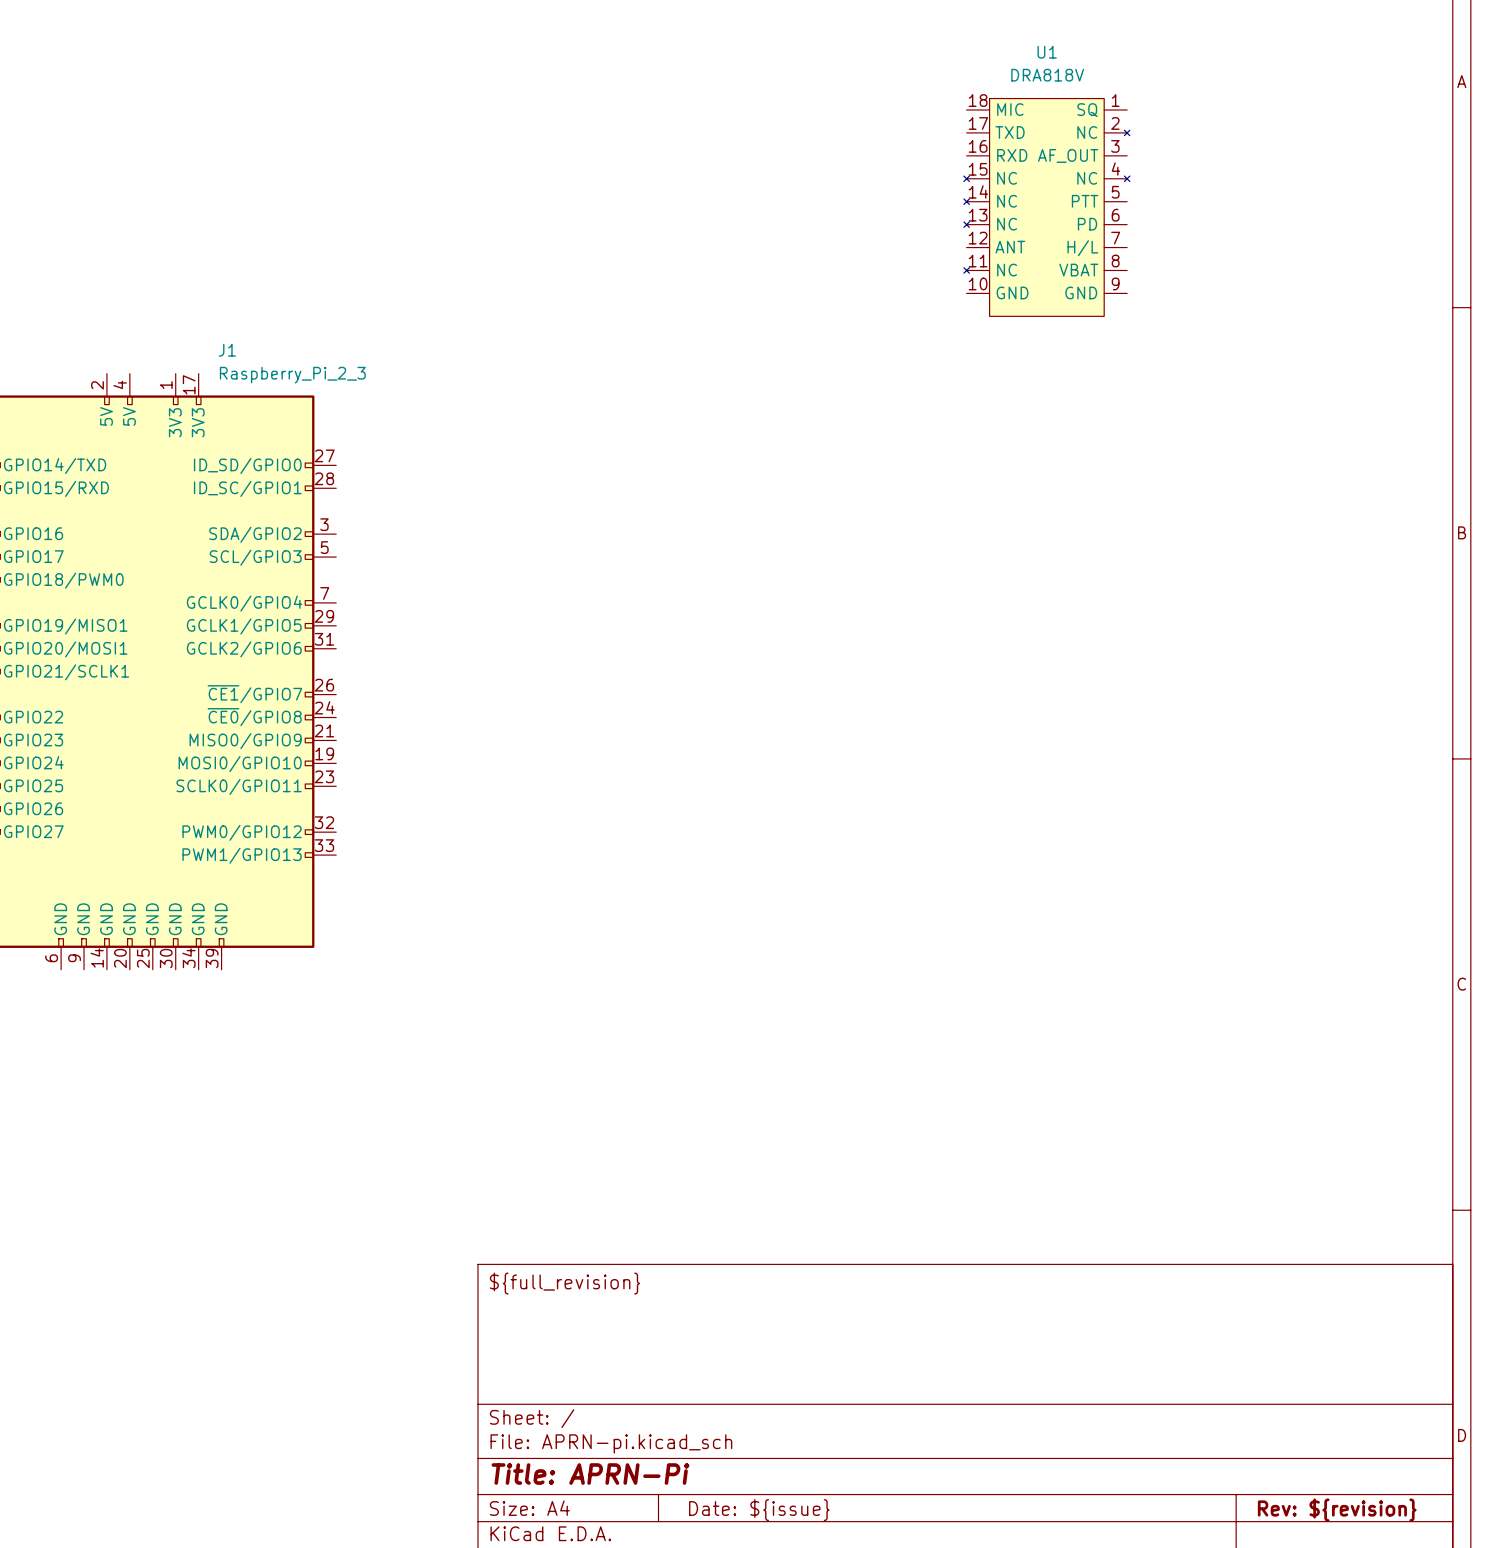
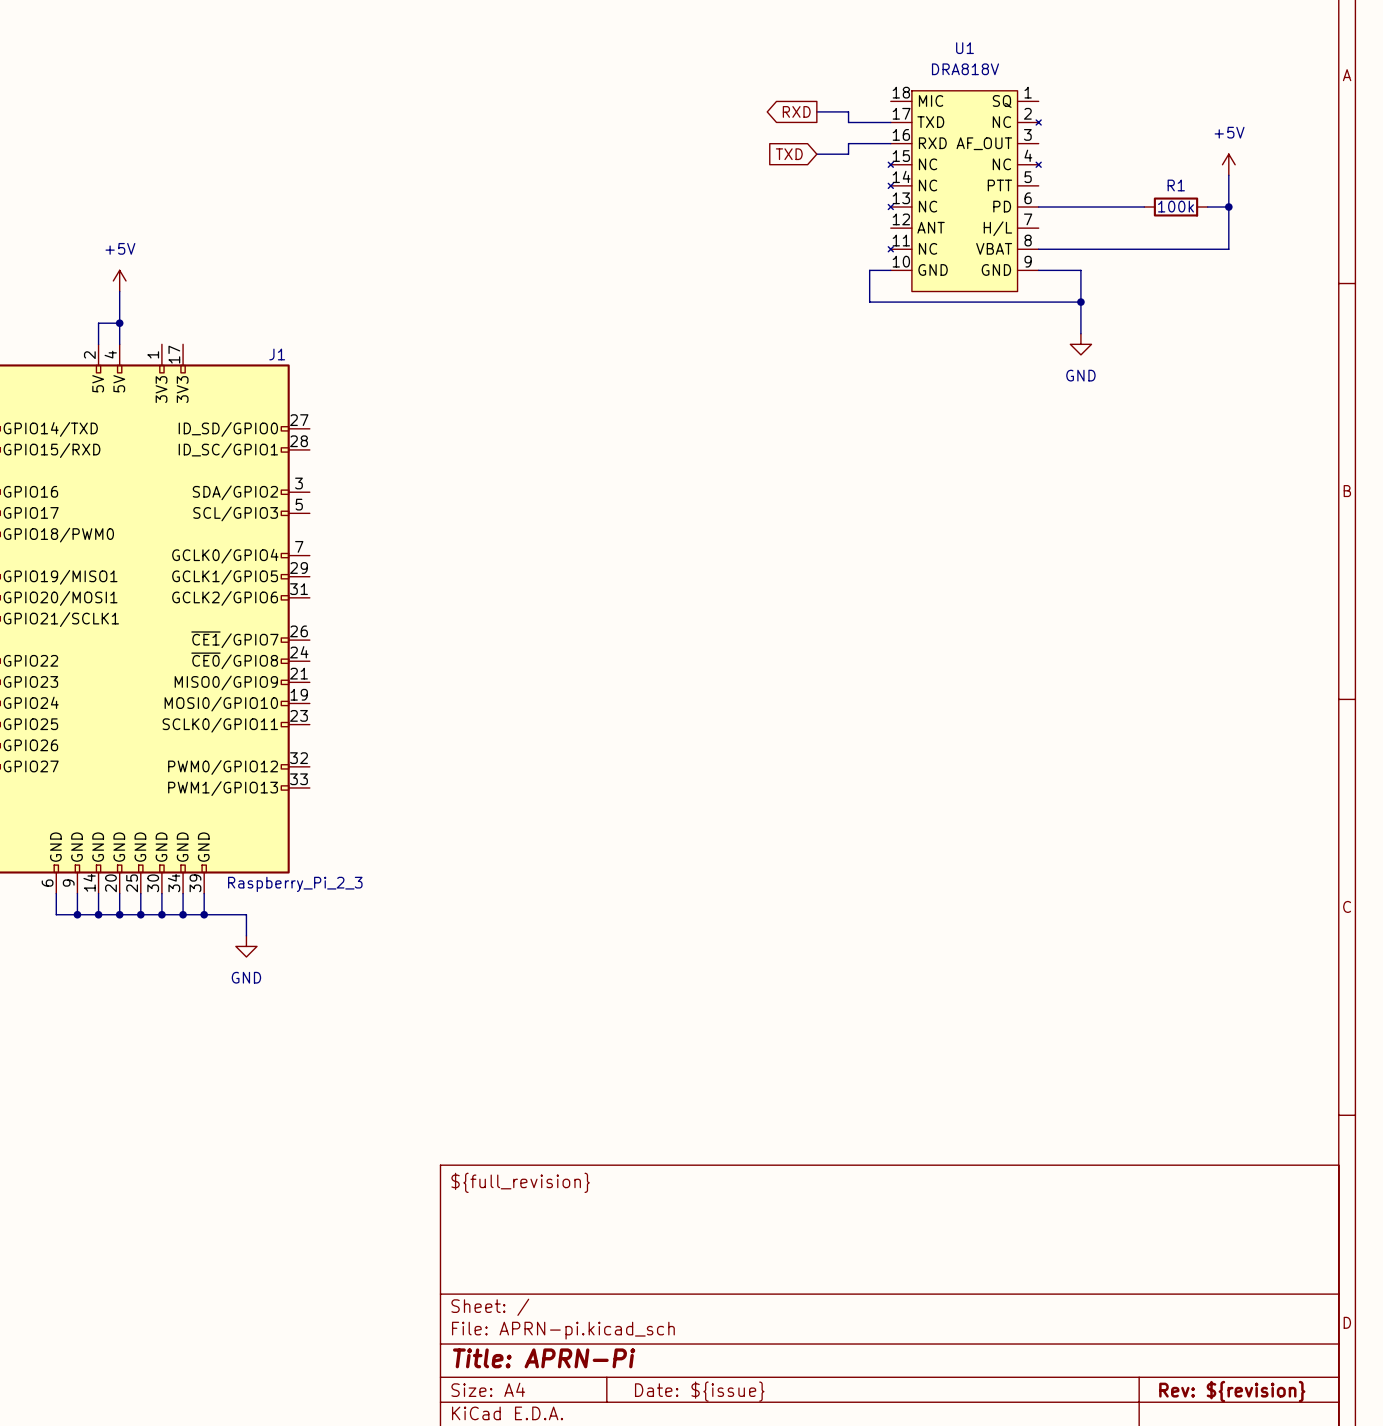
global label: none -> RXD (796, 111)
wire: none -> (816, 111) (848, 111) (848, 122) (890, 122)
wire: none -> (890, 143) (848, 143) (848, 154) (816, 154)
global label: none -> TXD (789, 154)
power symbol: none -> +5V (1228, 164)
wire: none -> (1228, 175) (1228, 249) (1038, 249)
wire: none -> (1038, 207) (1144, 207)
R1: none -> 100k (1176, 207)
wire: none -> (1207, 207) (1228, 207)
junction: none -> (1228, 207)
wire: none -> (890, 270) (869, 270) (869, 302) (1080, 302)
wire: none -> (1038, 270) (1080, 270) (1080, 333)
power symbol: none -> +5V (119, 280)
wire: none -> (119, 291) (119, 344)
junction: none -> (1080, 302)
wire: none -> (119, 323) (98, 323) (98, 344)
junction: none -> (119, 323)
J1 name position: J1 (227, 350) -> J1 (277, 354)
power symbol: none -> GND (1080, 344)
J1 value position: Raspberry_Pi_2_3 (292, 375) -> Raspberry_Pi_2_3 (295, 884)
wire: none -> (56, 893) (56, 914) (246, 914) (246, 935)
wire: none -> (77, 893) (77, 914)
wire: none -> (98, 893) (98, 914)
wire: none -> (119, 893) (119, 914)
wire: none -> (140, 893) (140, 914)
wire: none -> (161, 893) (161, 914)
wire: none -> (183, 893) (183, 914)
wire: none -> (204, 893) (204, 914)
junction: none -> (77, 914)
junction: none -> (98, 914)
junction: none -> (119, 914)
junction: none -> (140, 914)
junction: none -> (161, 914)
junction: none -> (183, 914)
junction: none -> (204, 914)
power symbol: none -> GND (246, 946)

